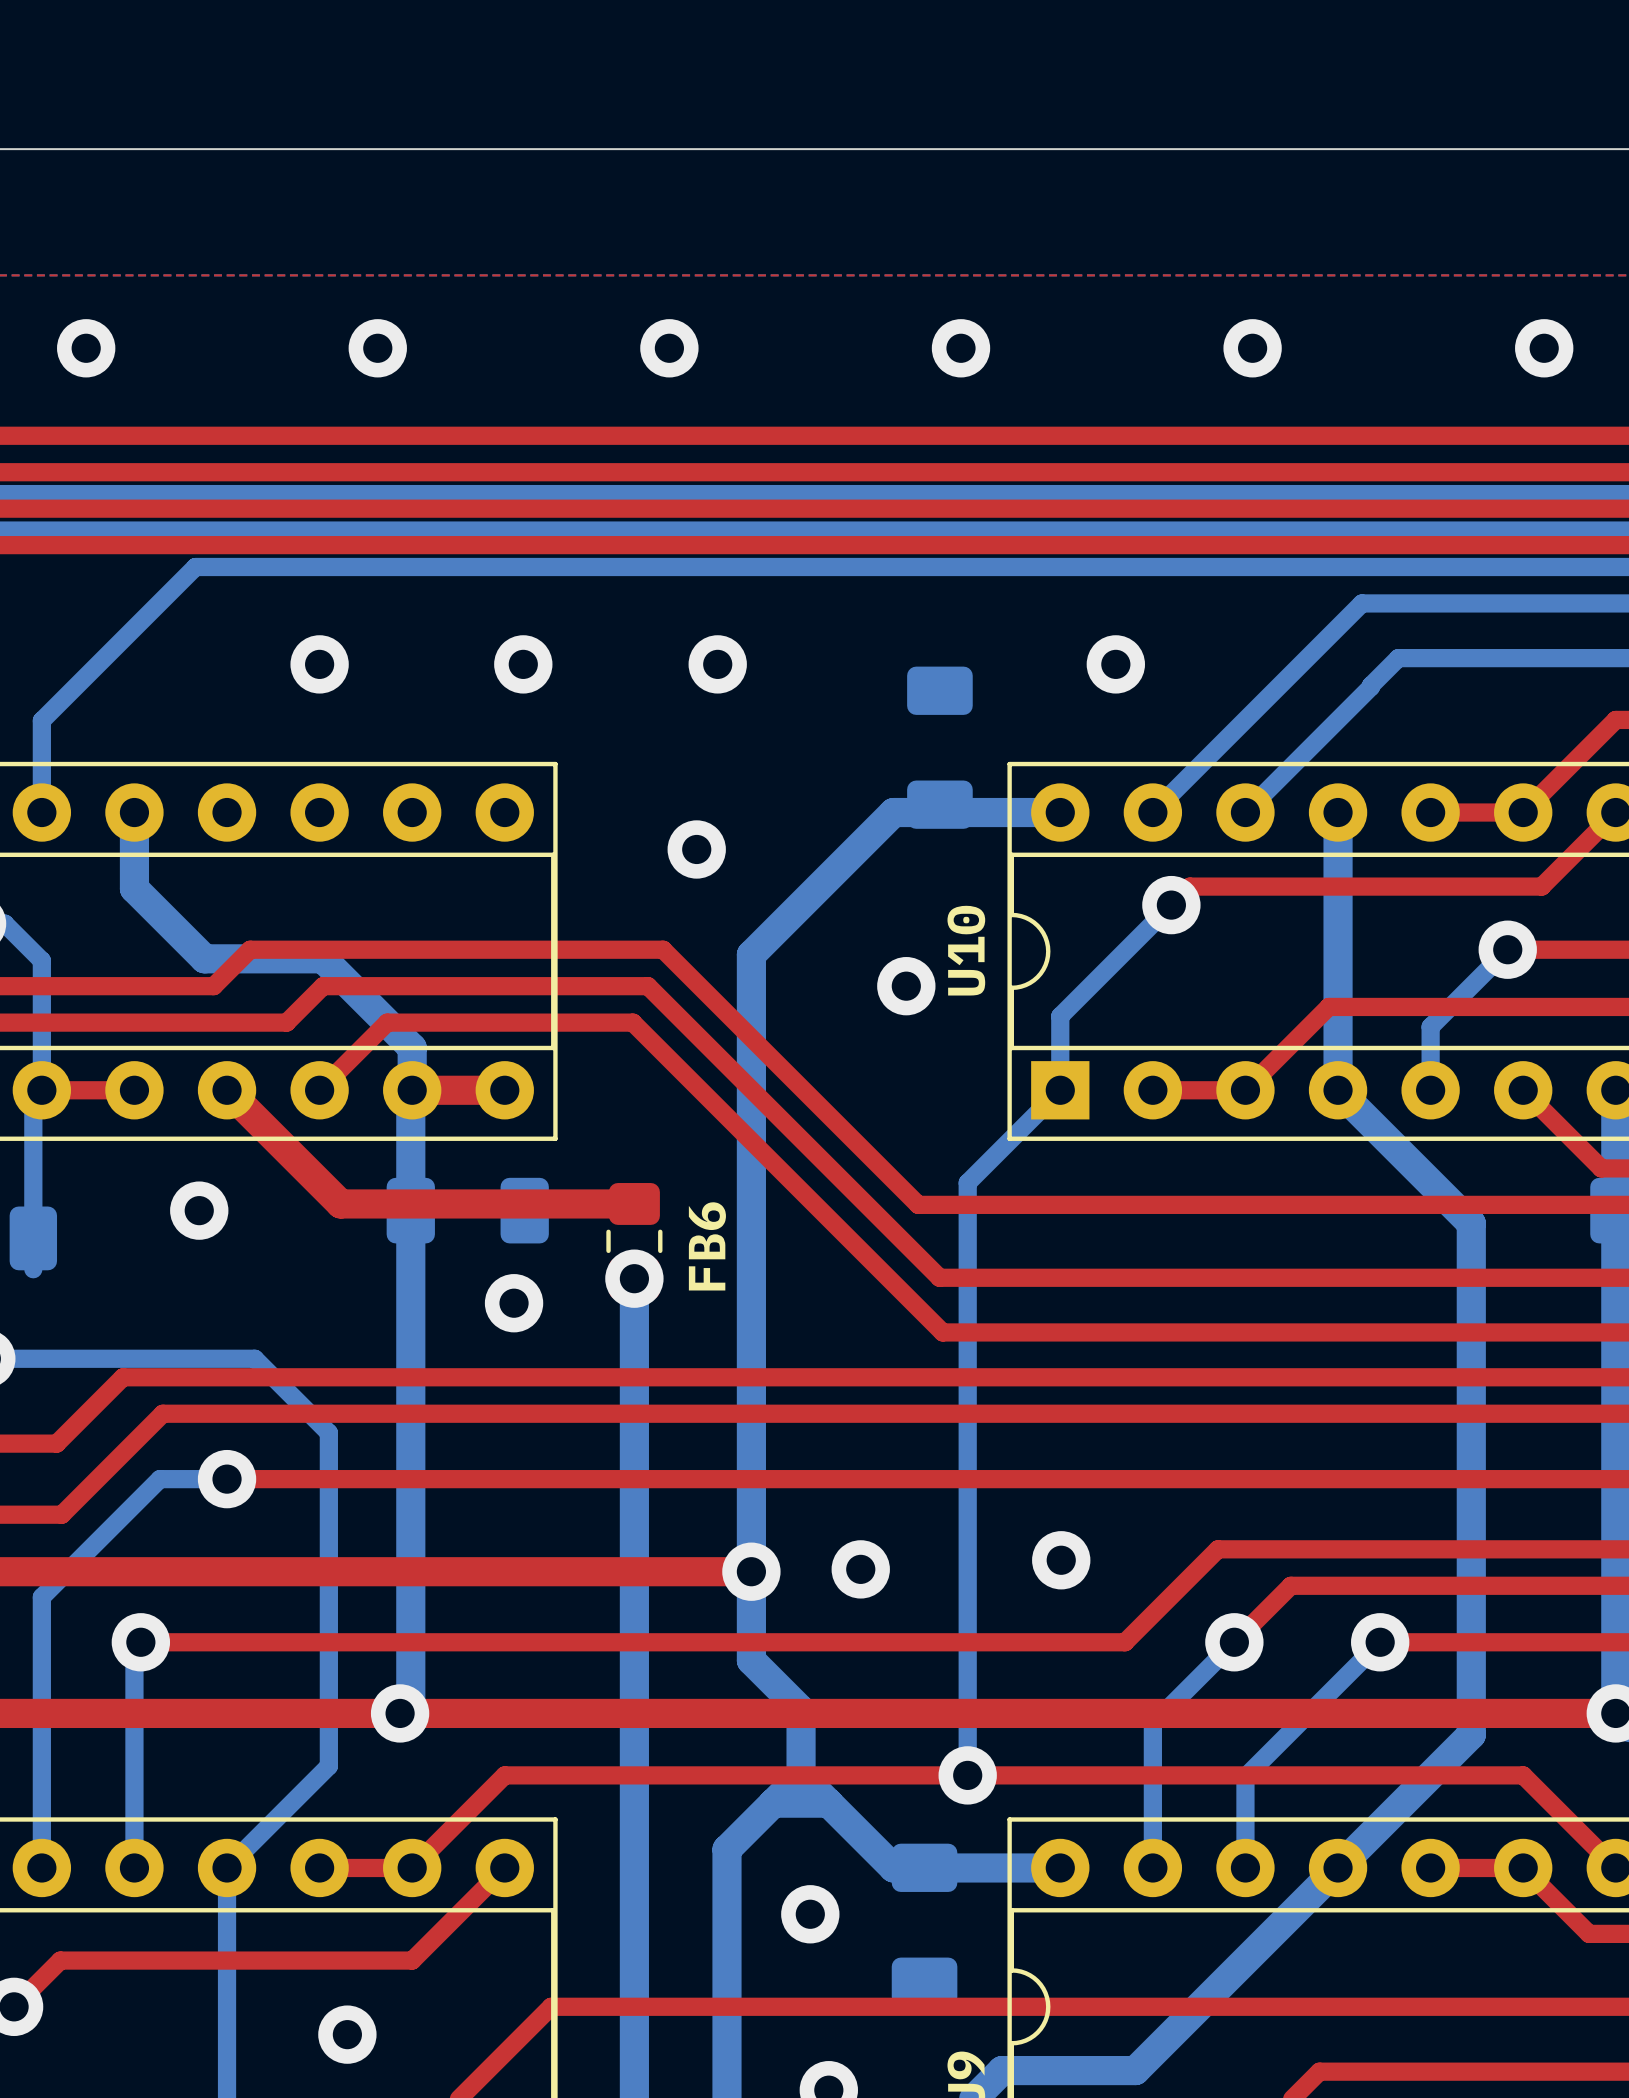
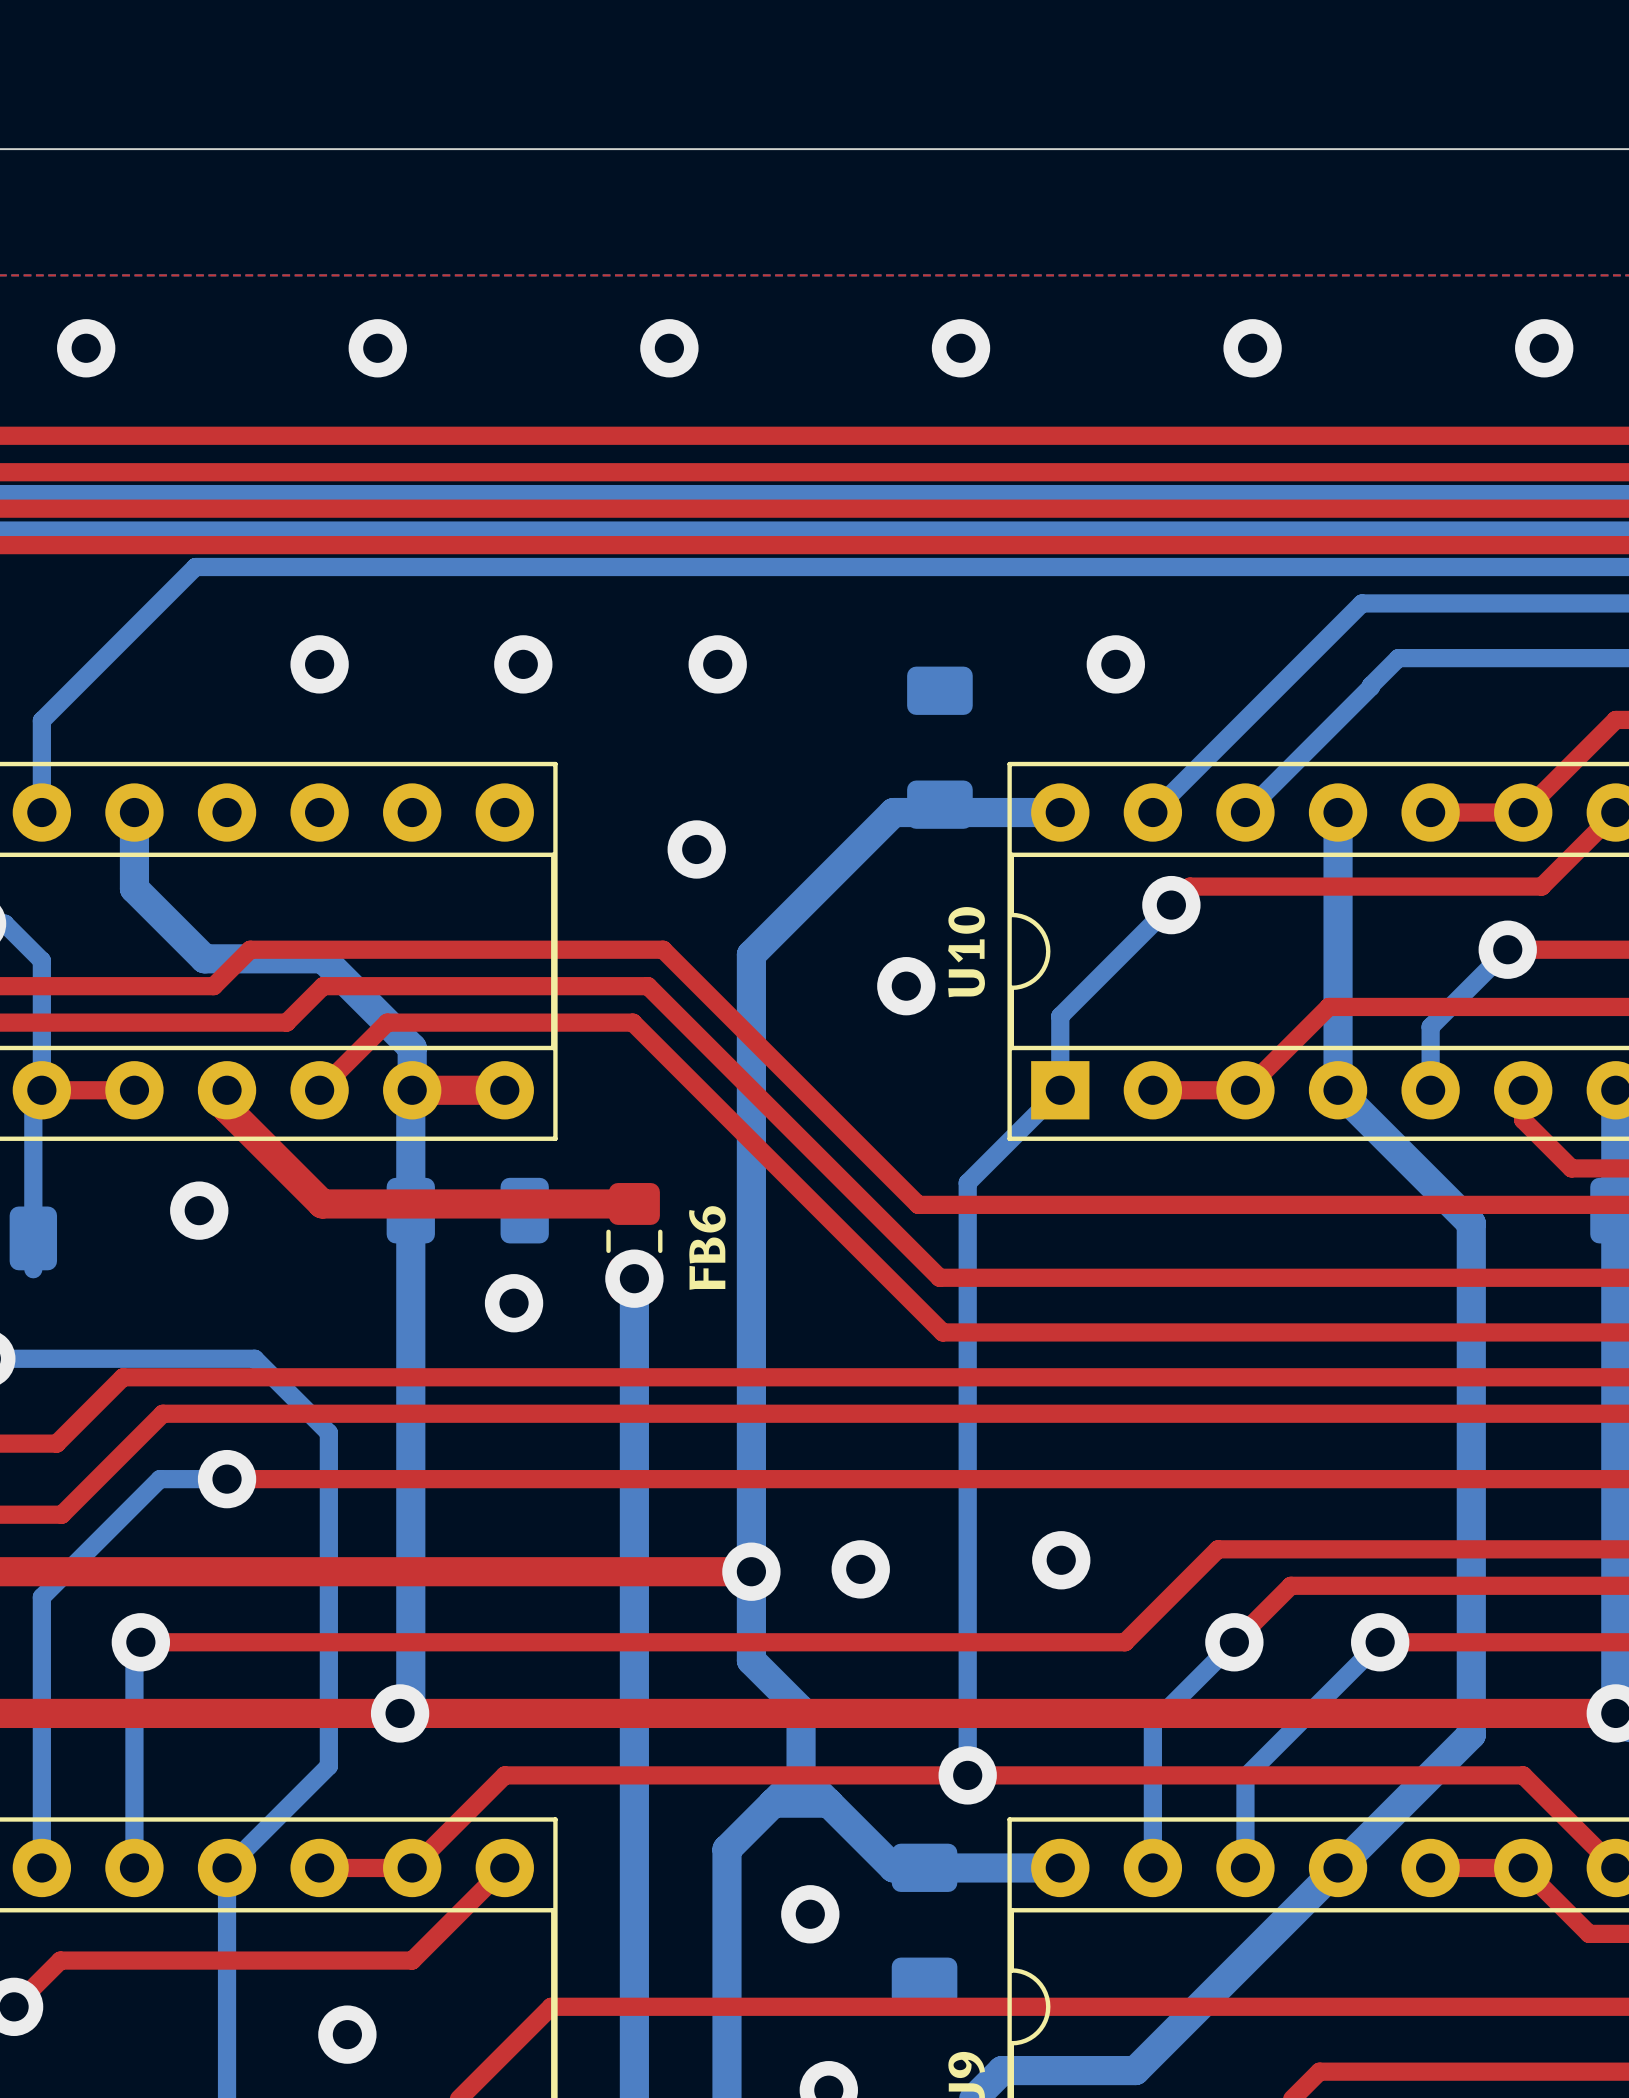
top track: (227, 1090) (340, 1203) -> (227, 1090) (227, 1108) (322, 1203) (340, 1203)
top track: (1523, 1090) (1601, 1168) -> (1523, 1090) (1523, 1120) (1571, 1168) (1601, 1168)

